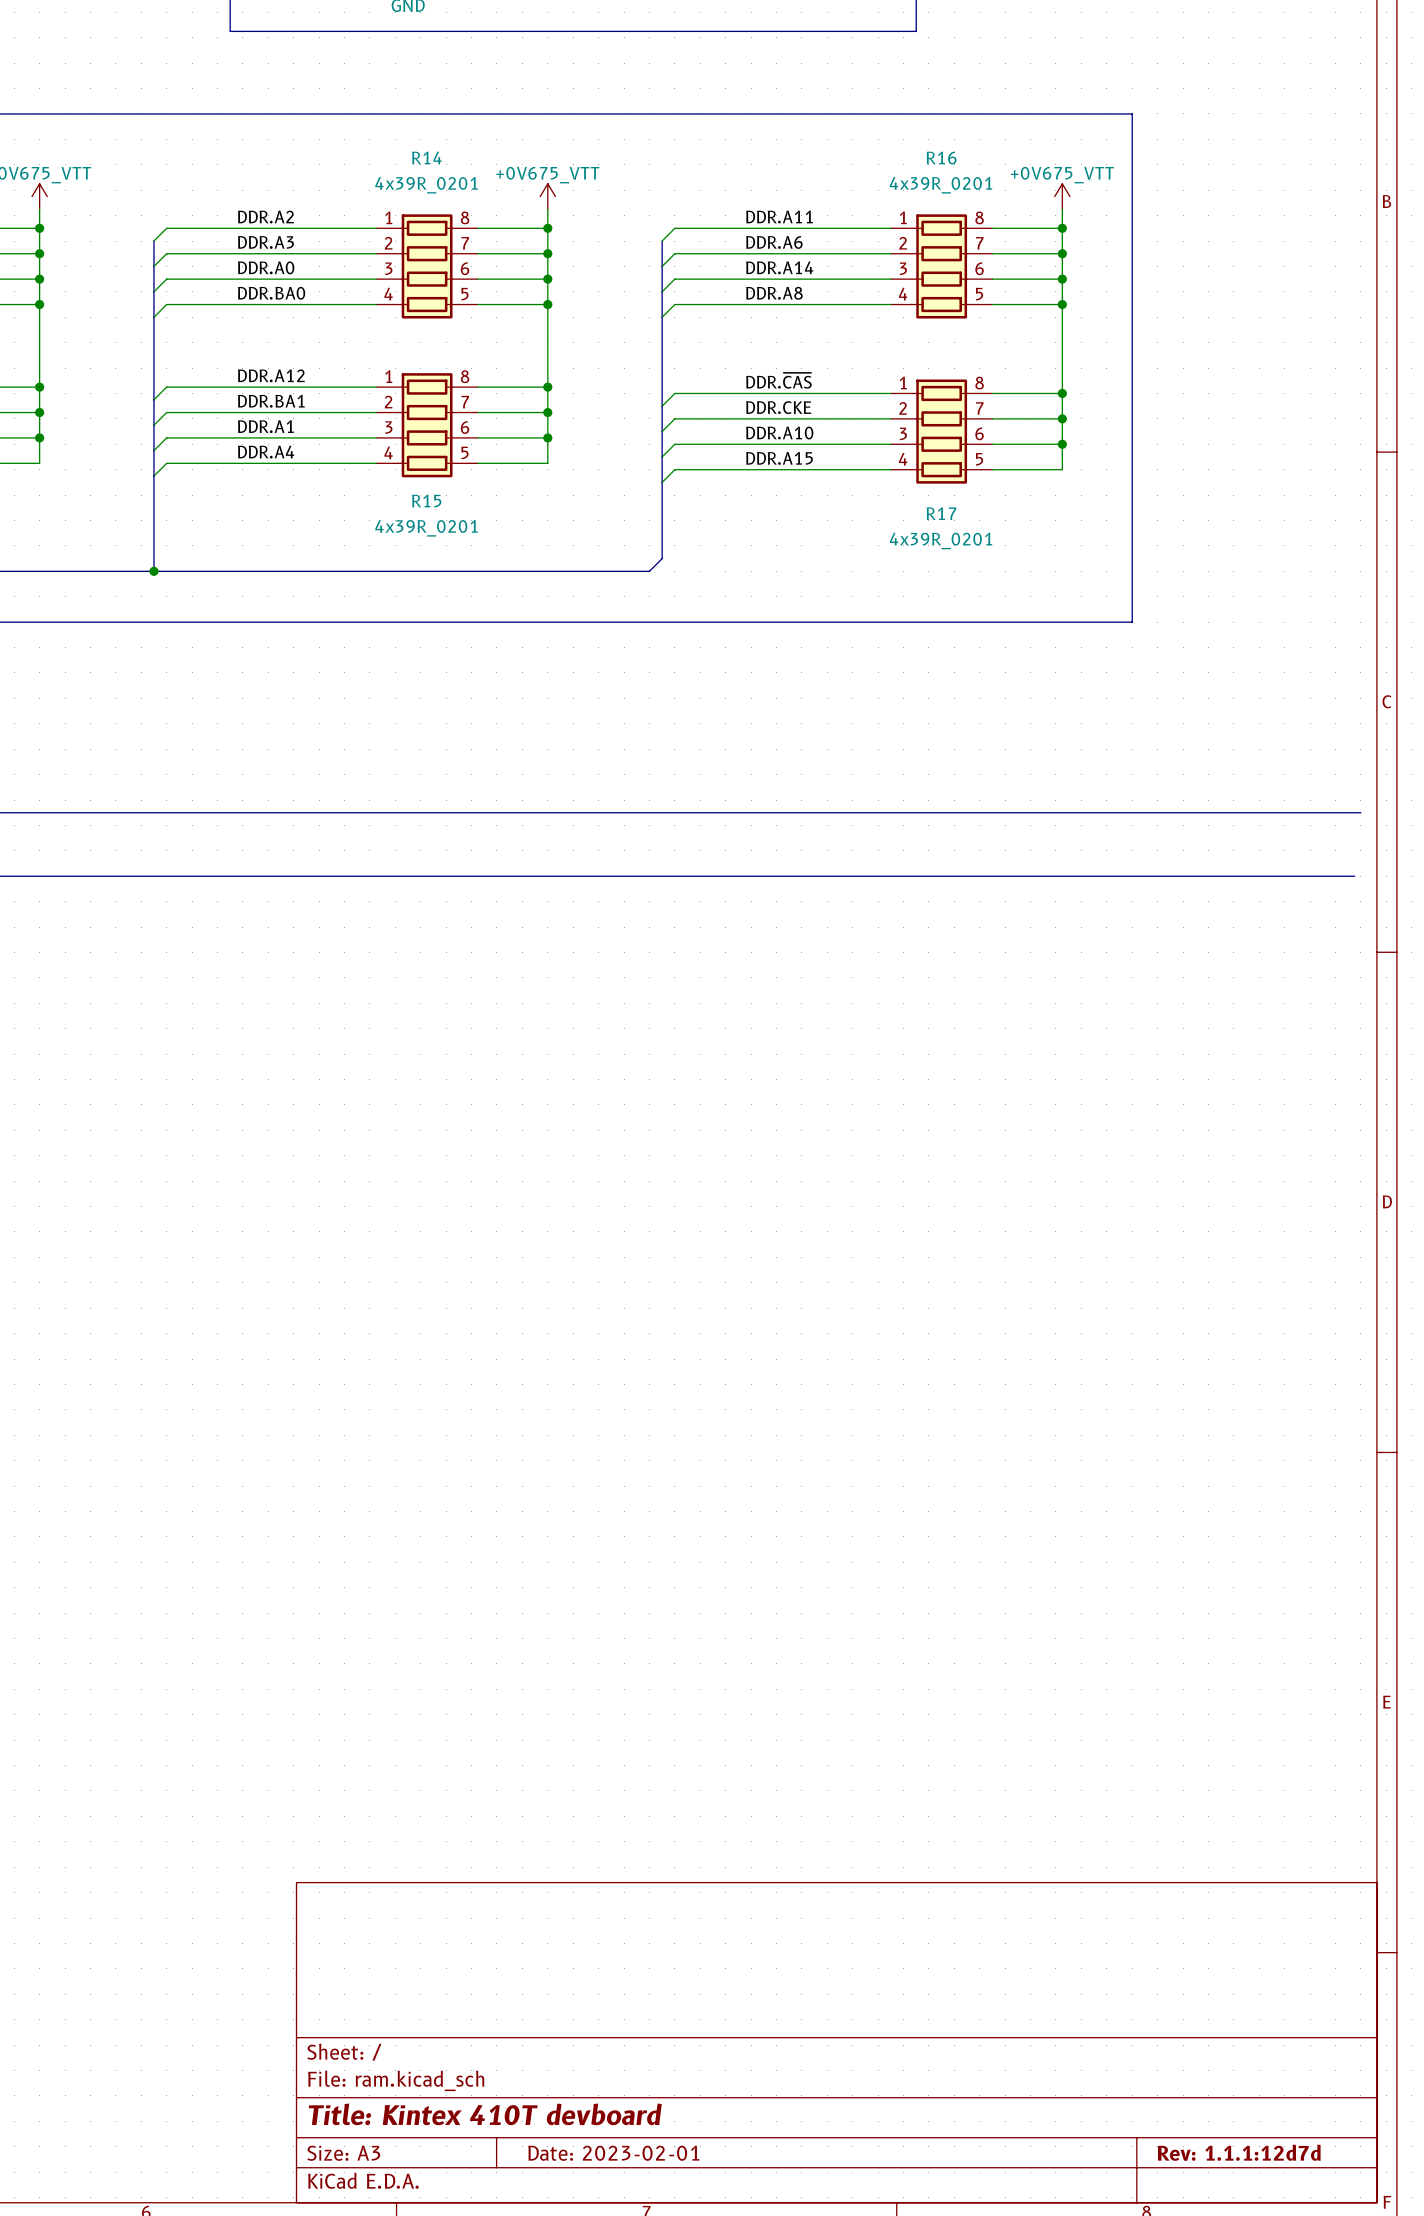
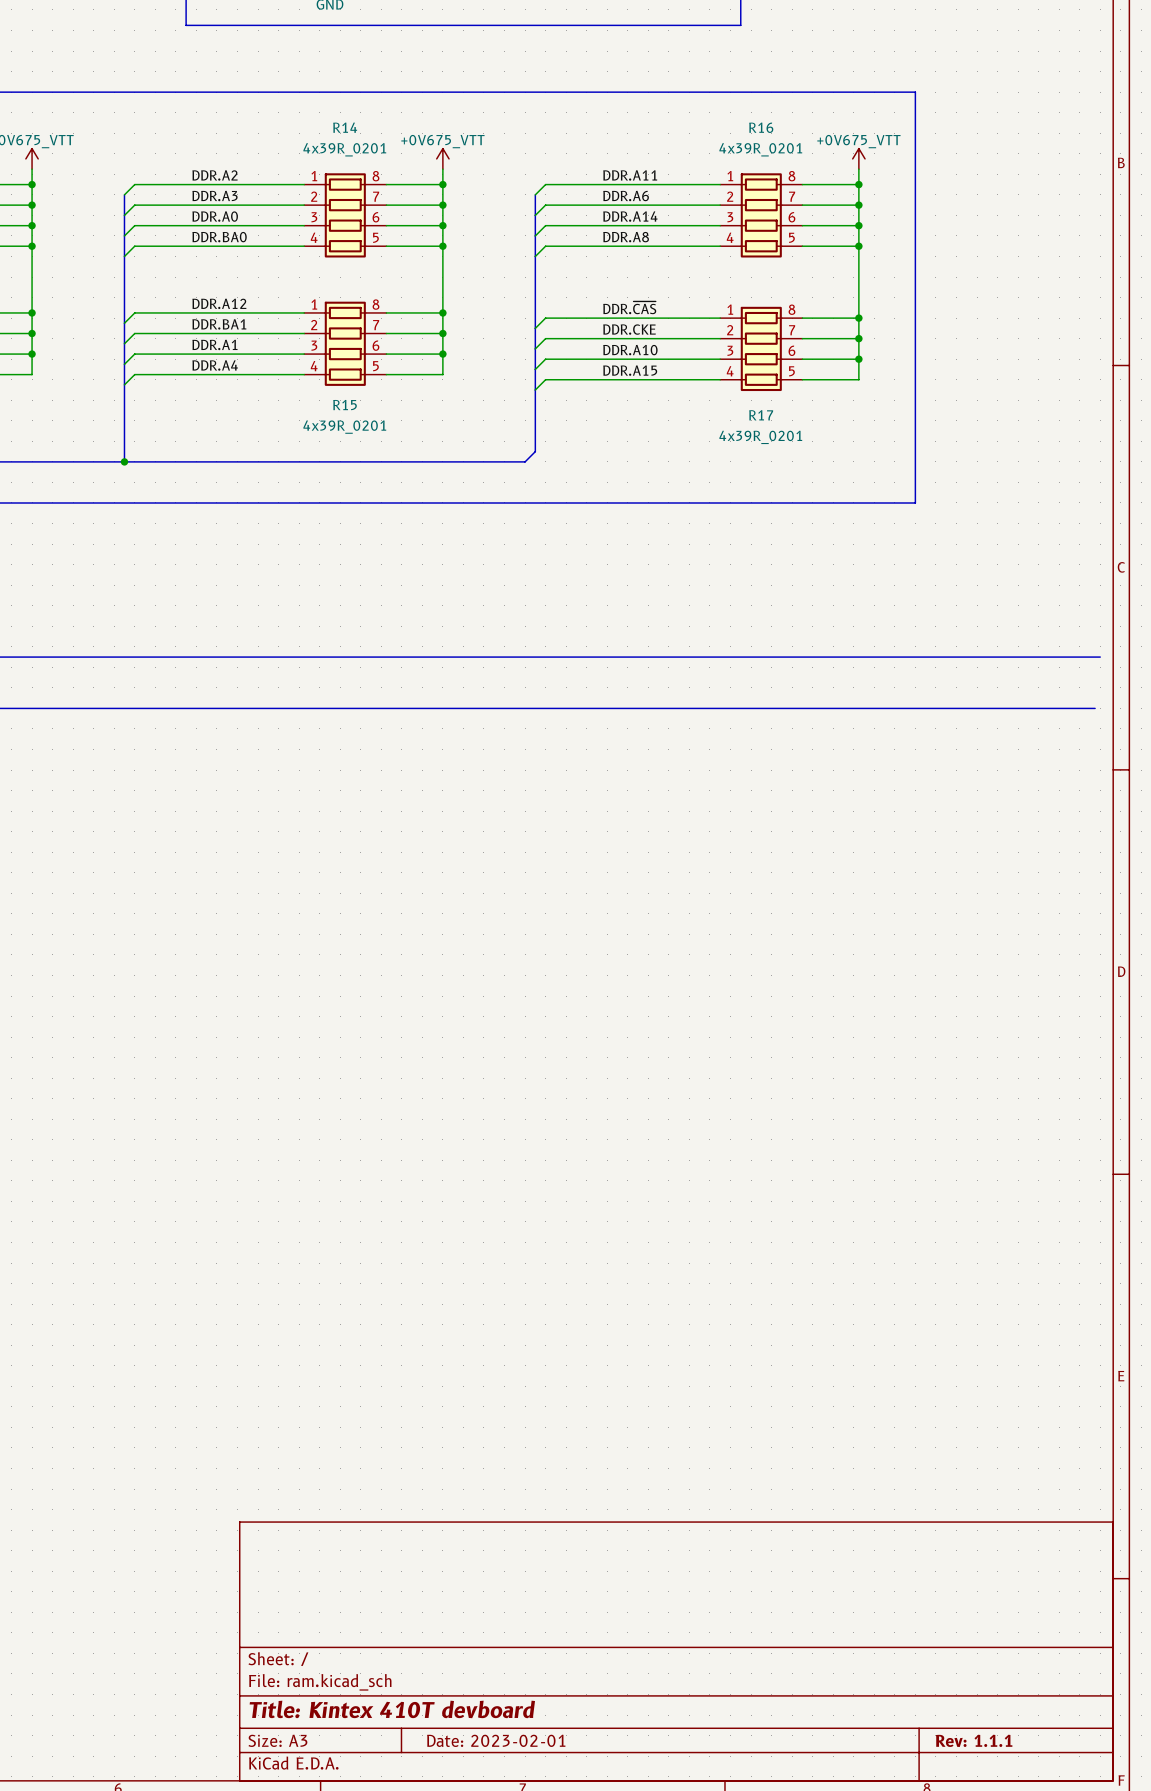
title block: Rev: 1.1.1:12d7d (1239, 2152) -> Rev: 1.1.1 (974, 1740)

